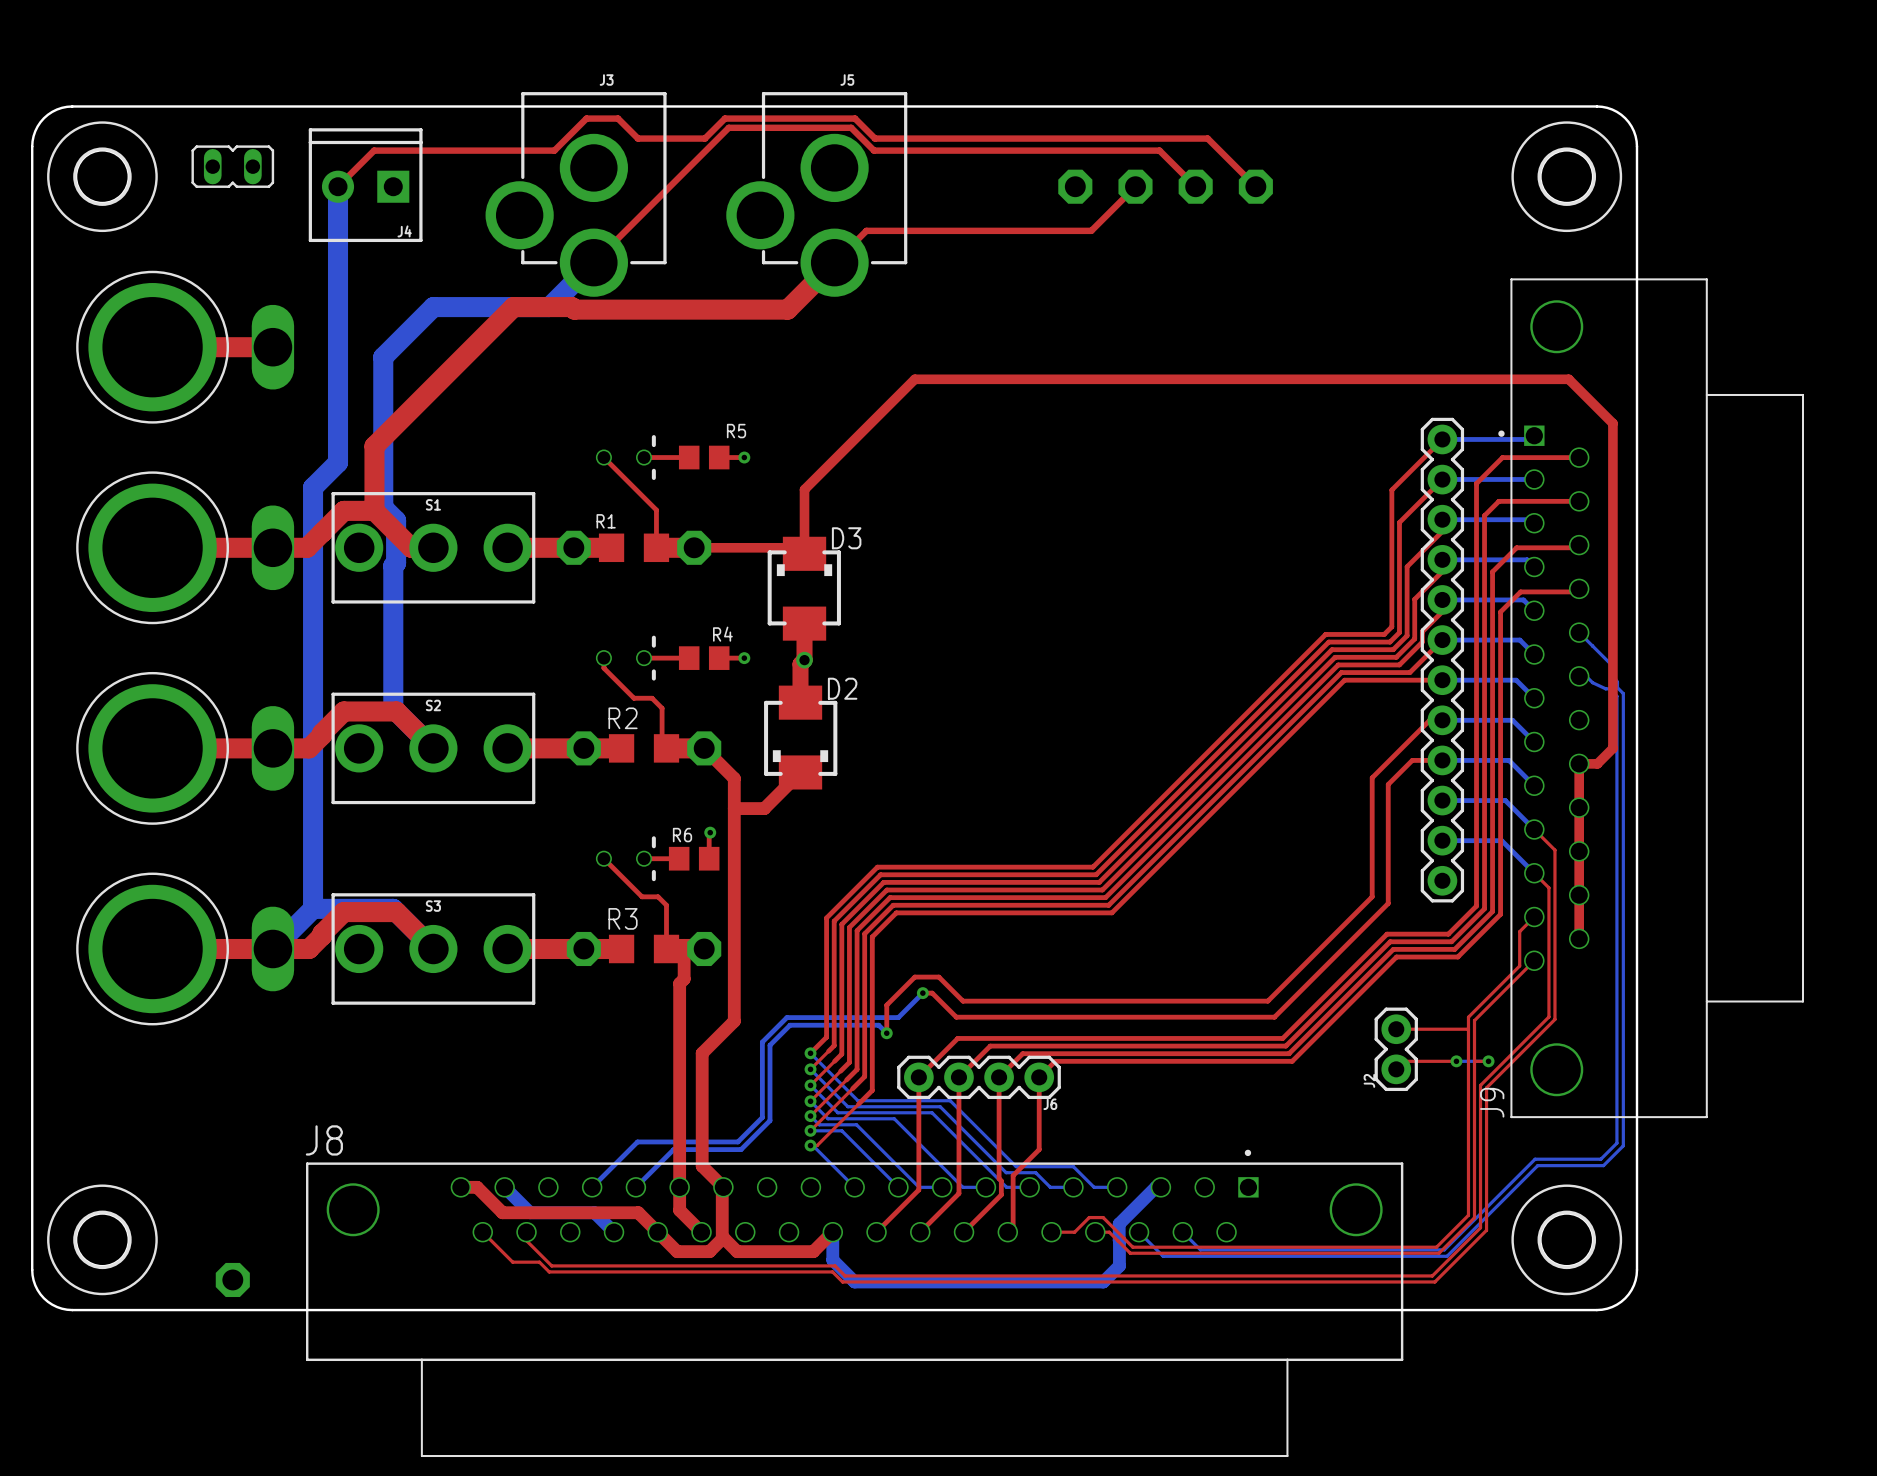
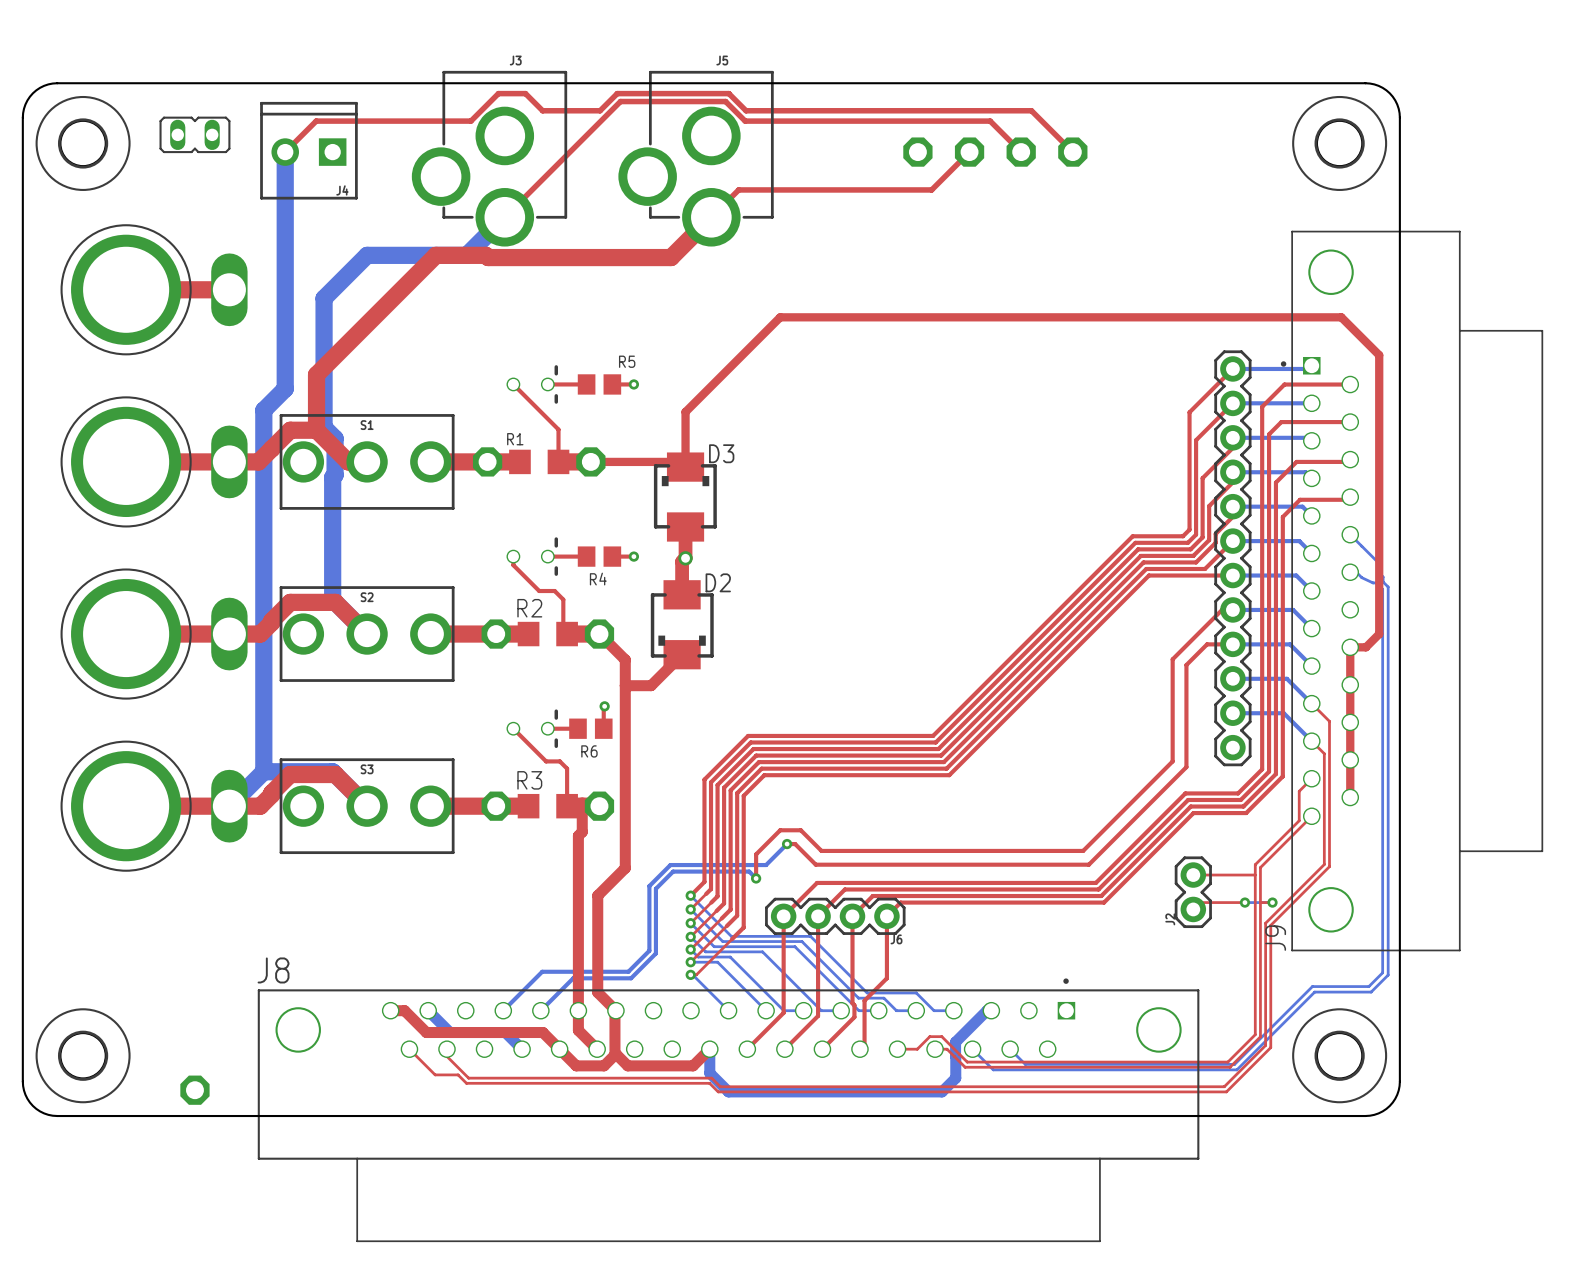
R4 name position: R4 (722, 634) -> R4 (598, 579)
R6 name position: R6 (682, 835) -> R6 (589, 751)

